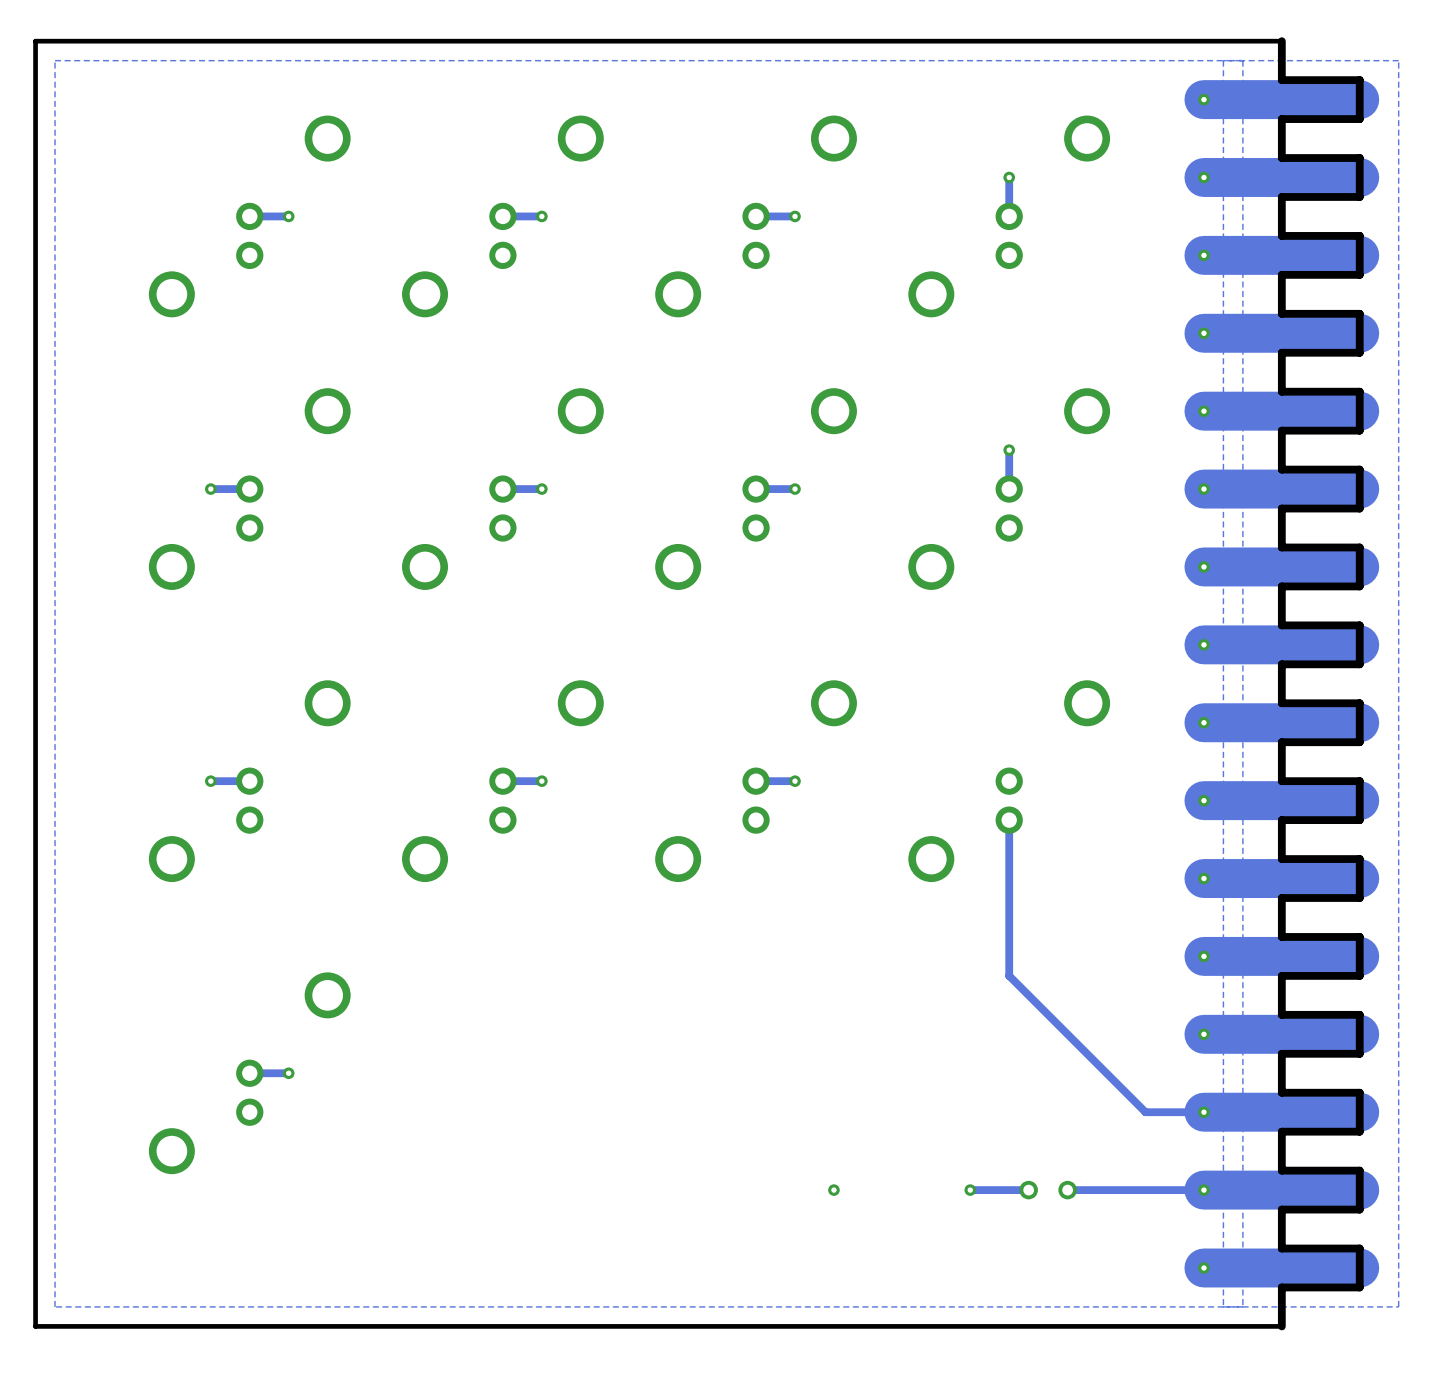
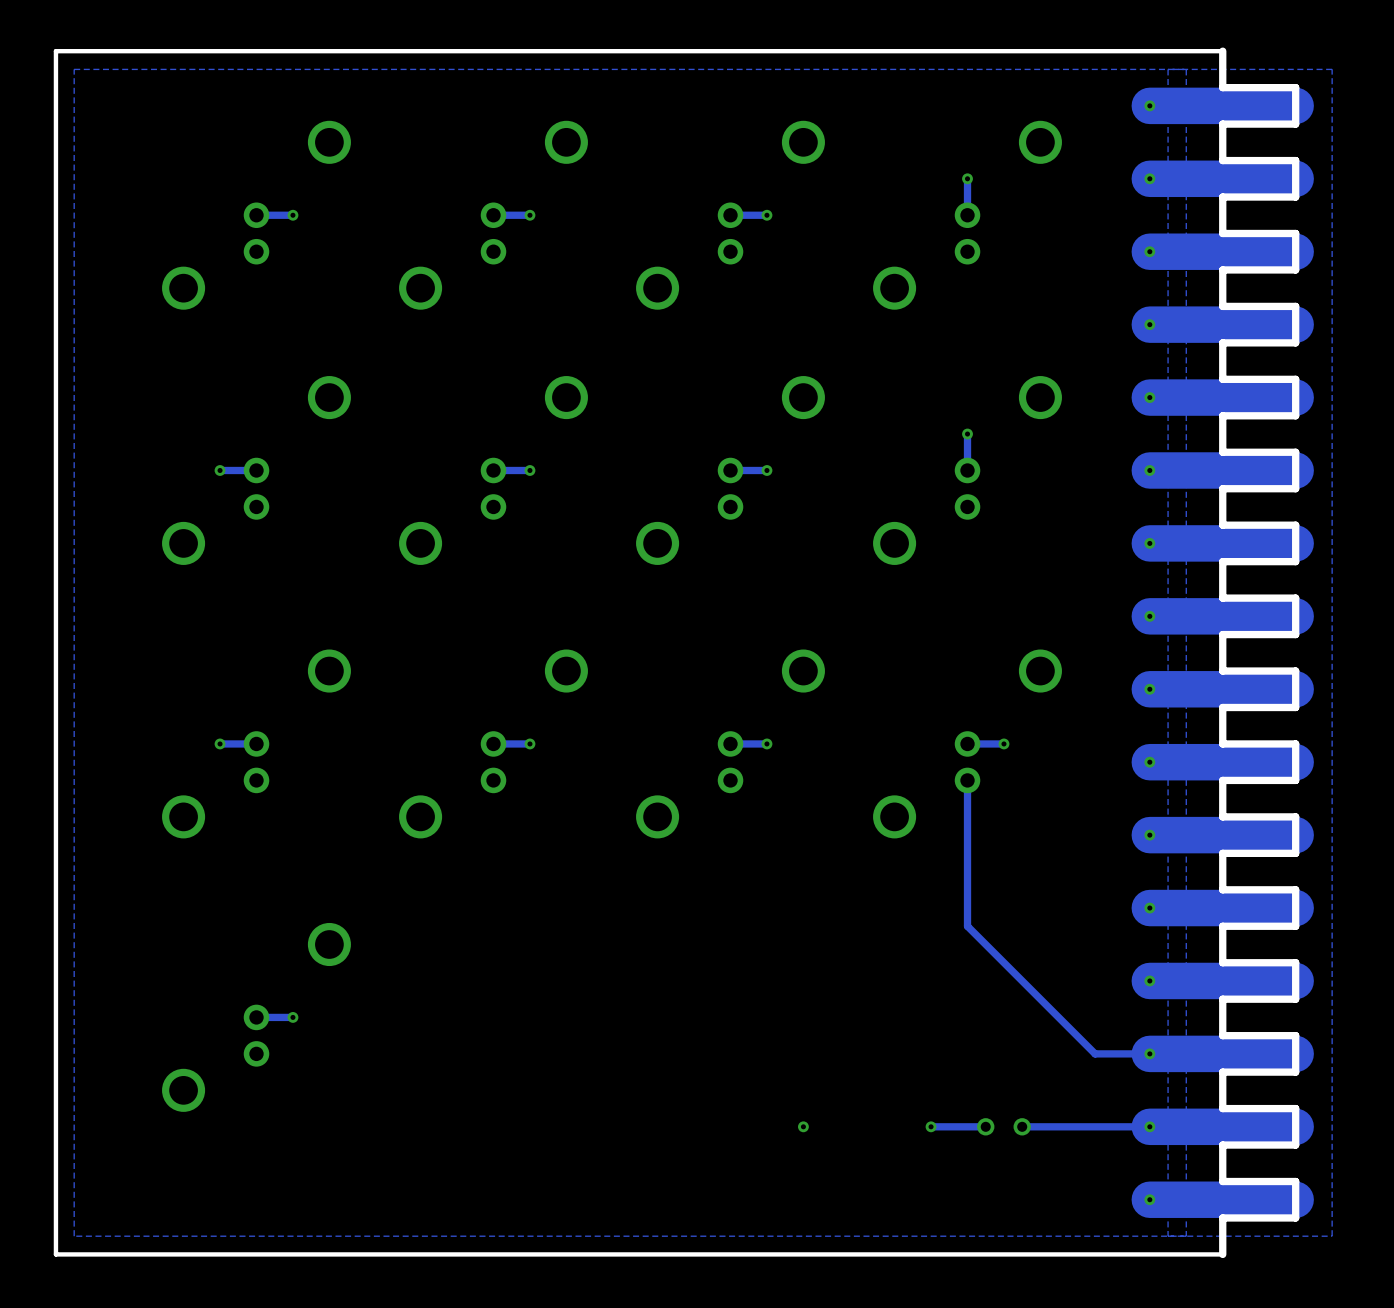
track: none -> (1003, 743) (967, 743)
via: none -> (1003, 743)

